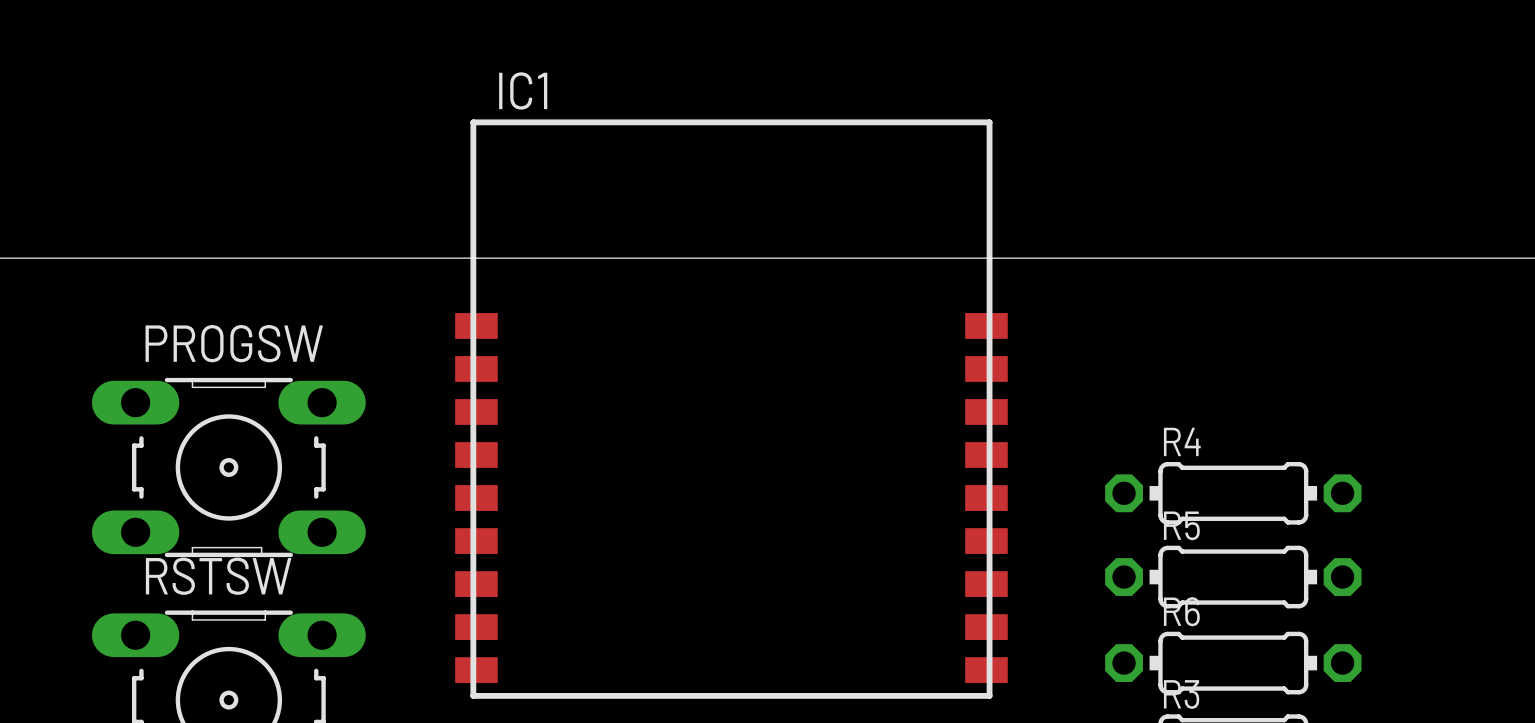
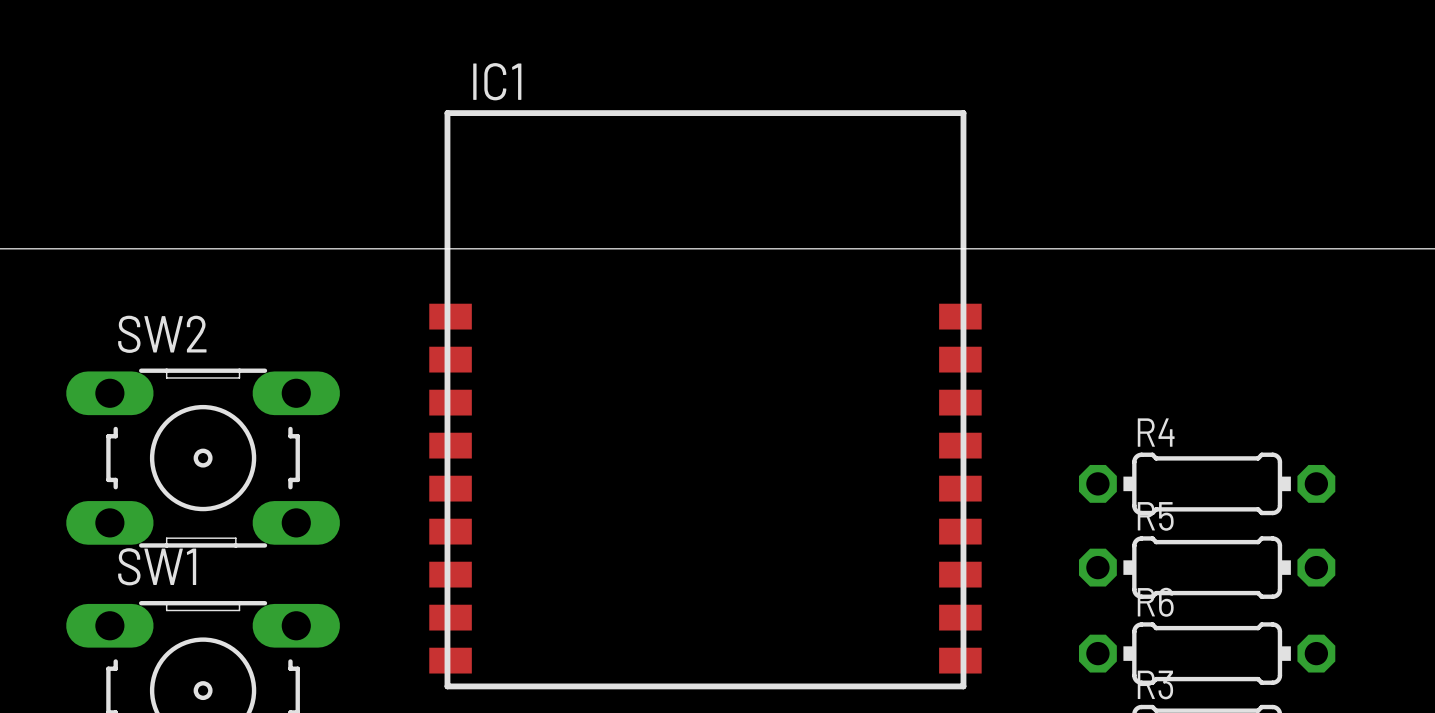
PROGSW name: PROGSW (234, 343) -> SW2 (162, 334)
RSTSW name: RSTSW (218, 576) -> SW1 (157, 566)

